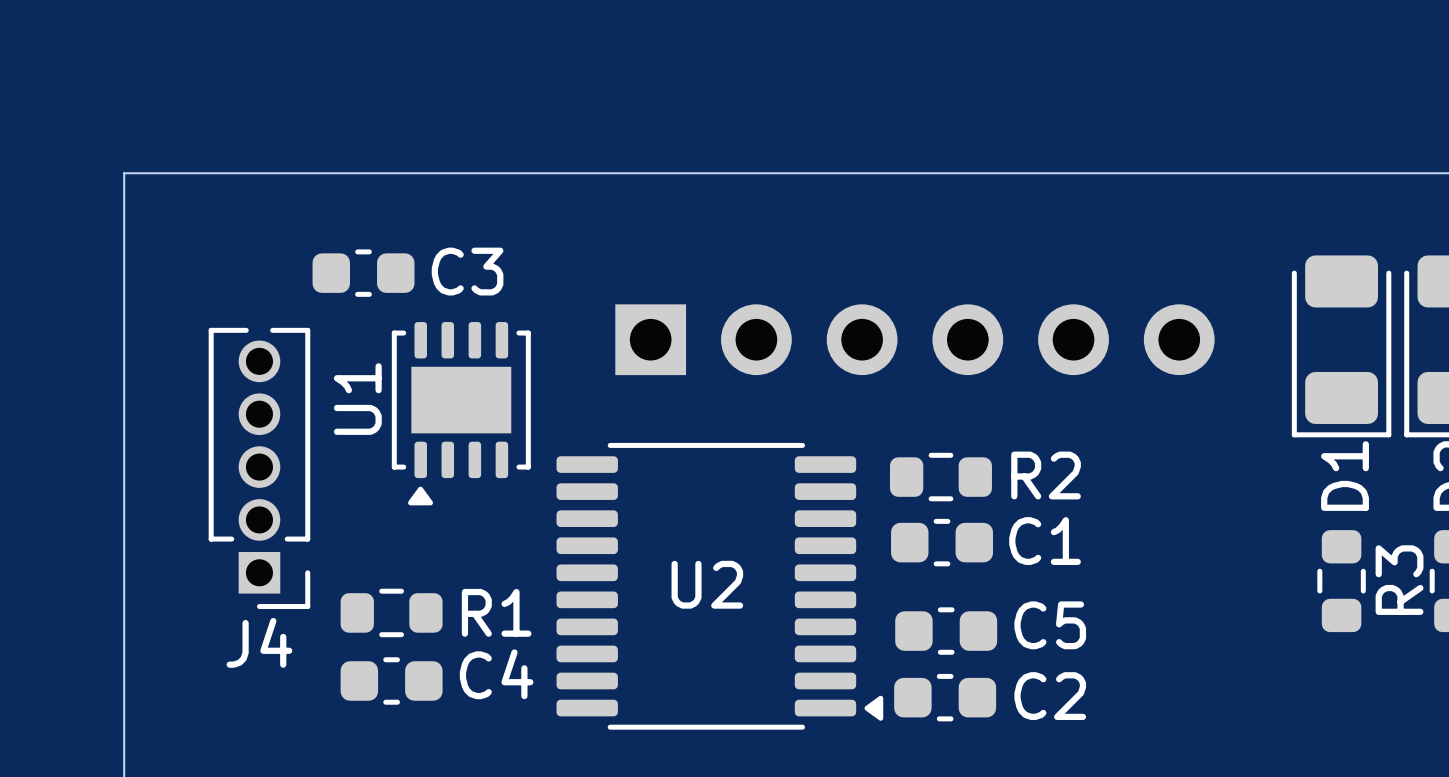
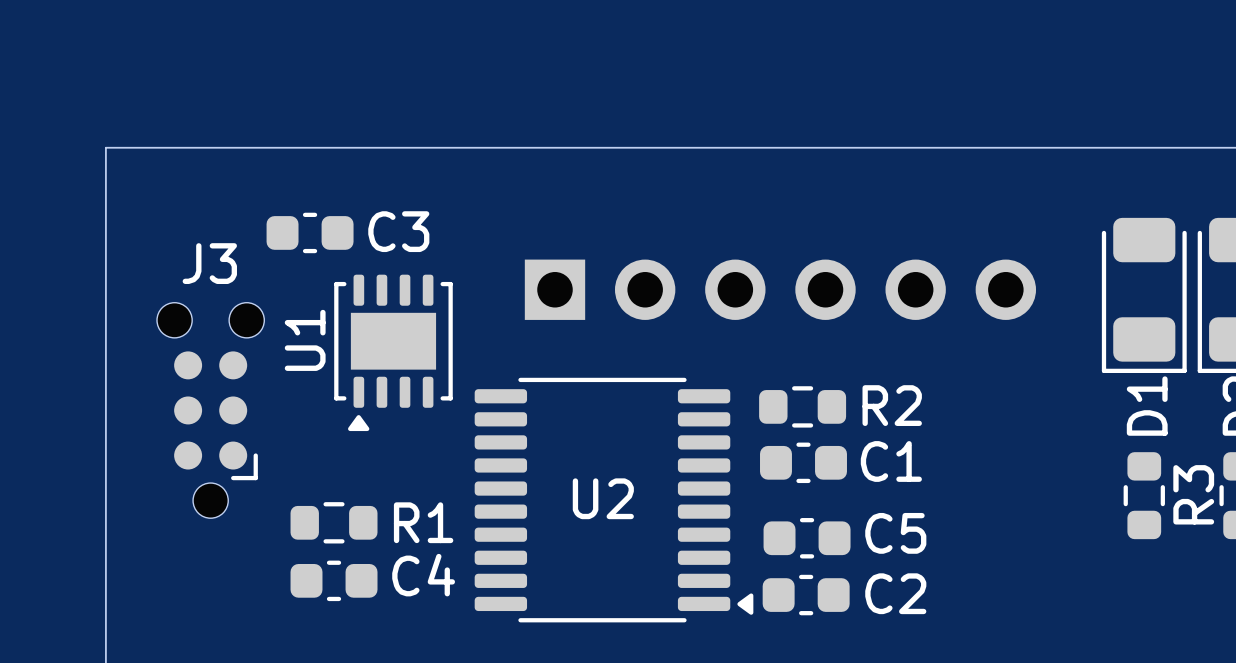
J4: (259, 468) -> none
J3: none -> (210, 410)

